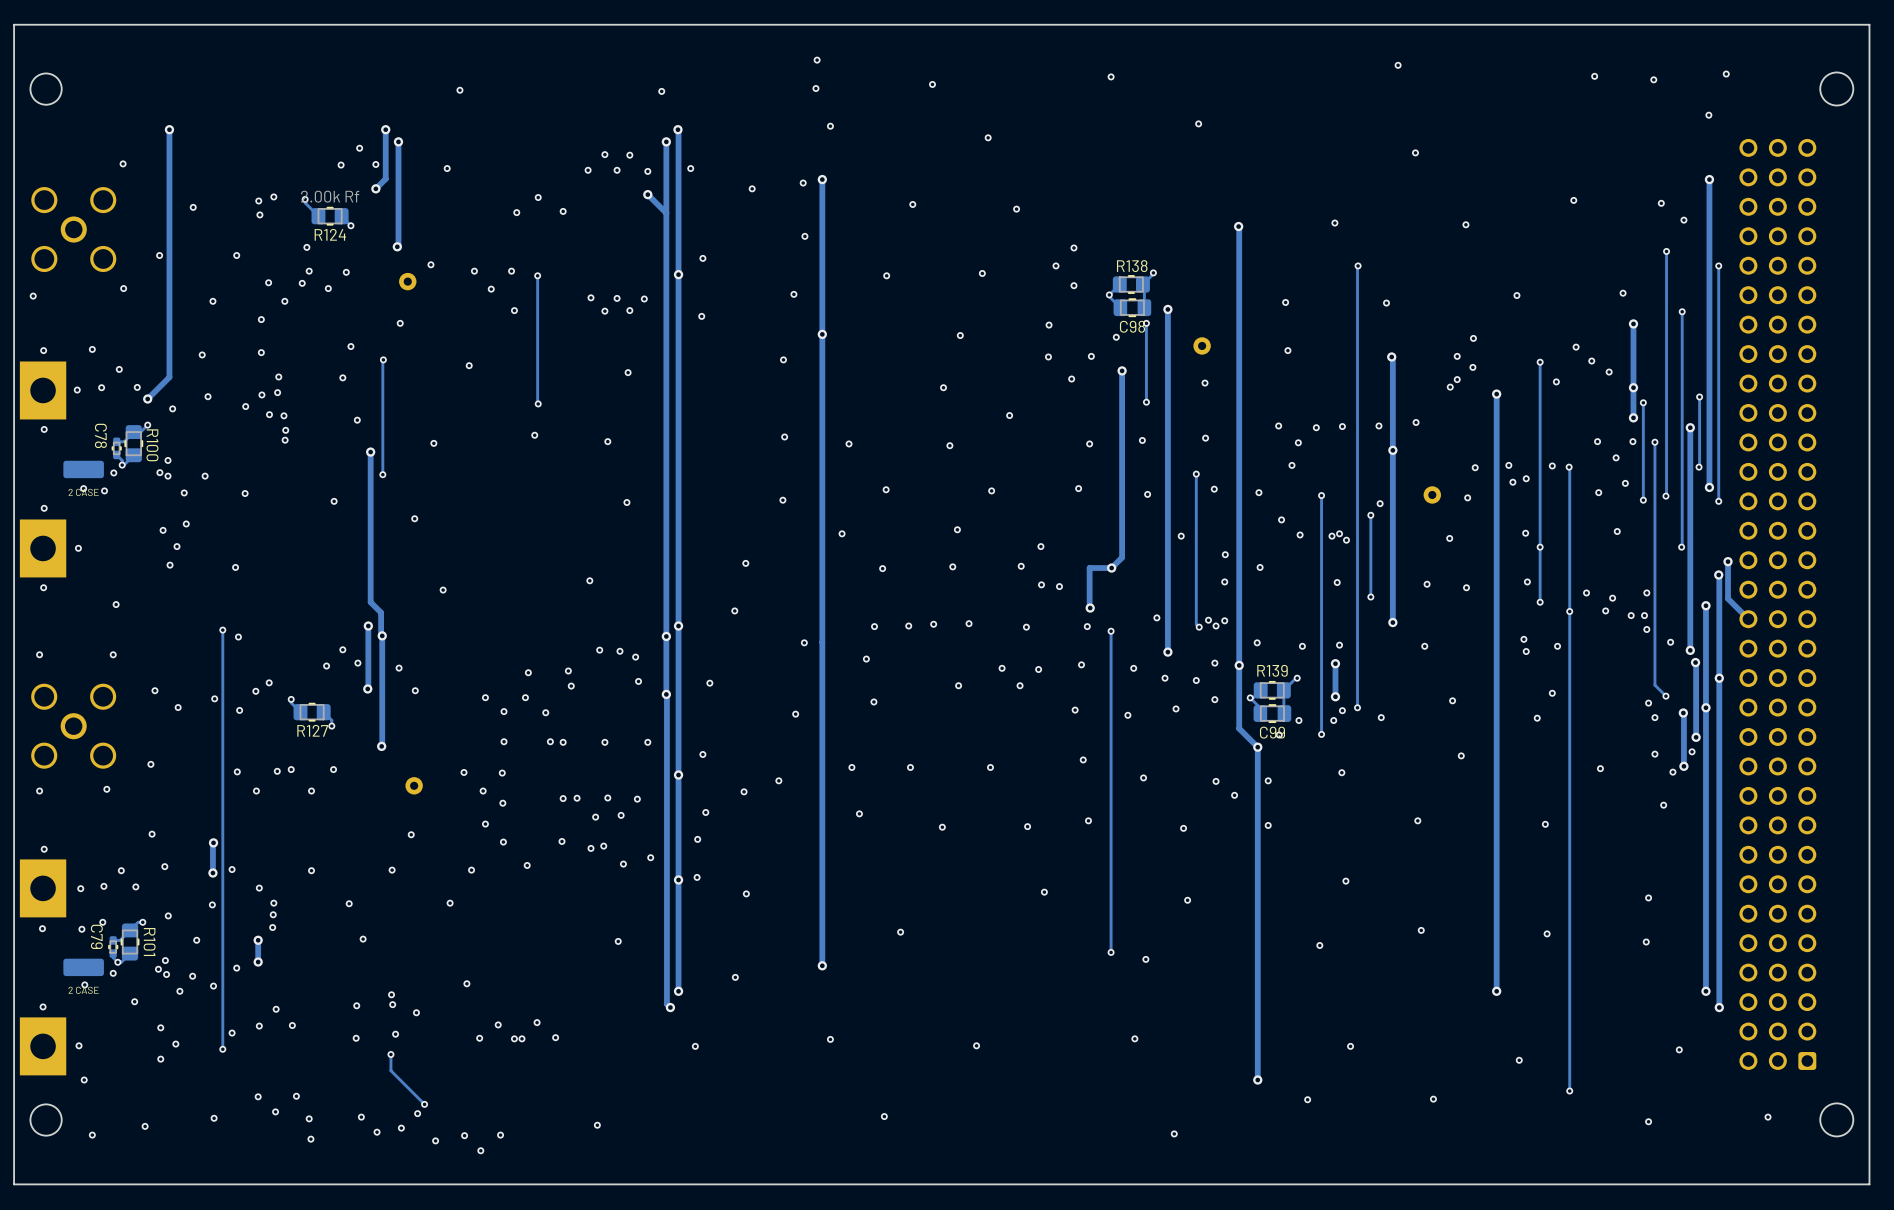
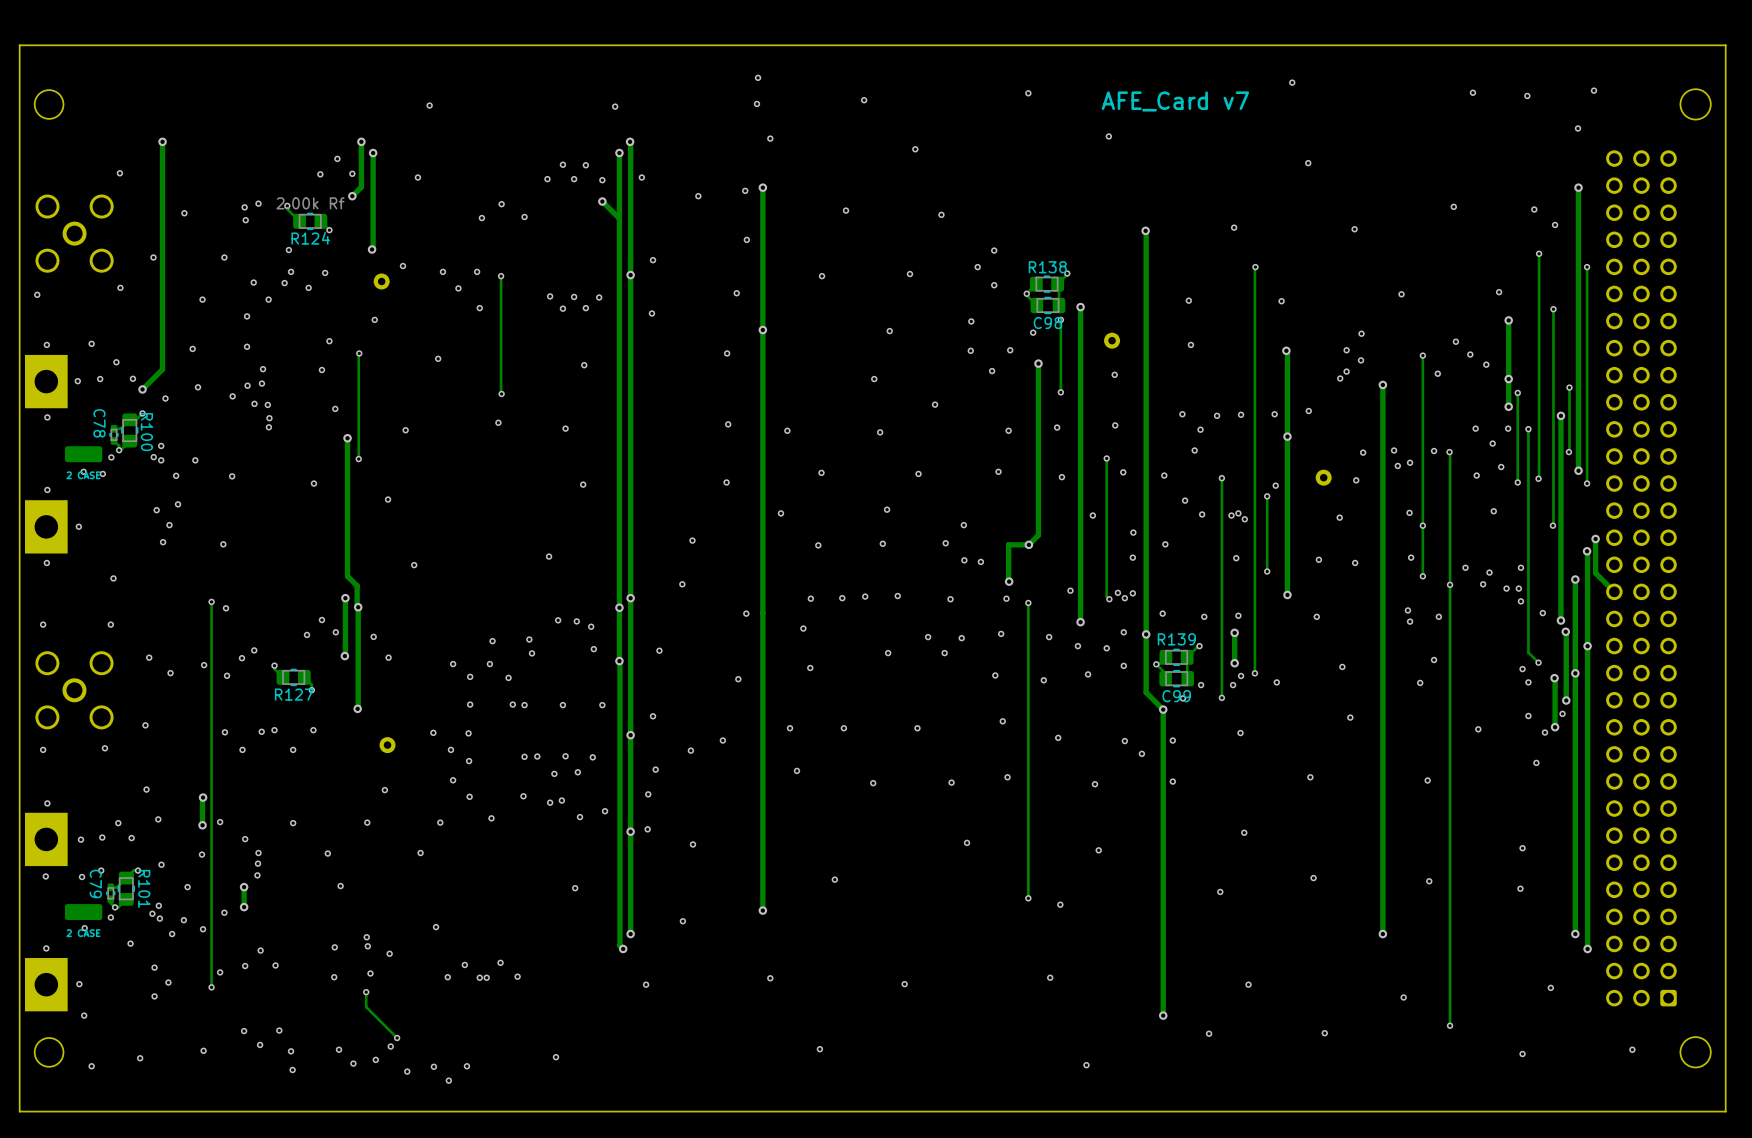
text: none -> AFE_Card v7 (1175, 101)

